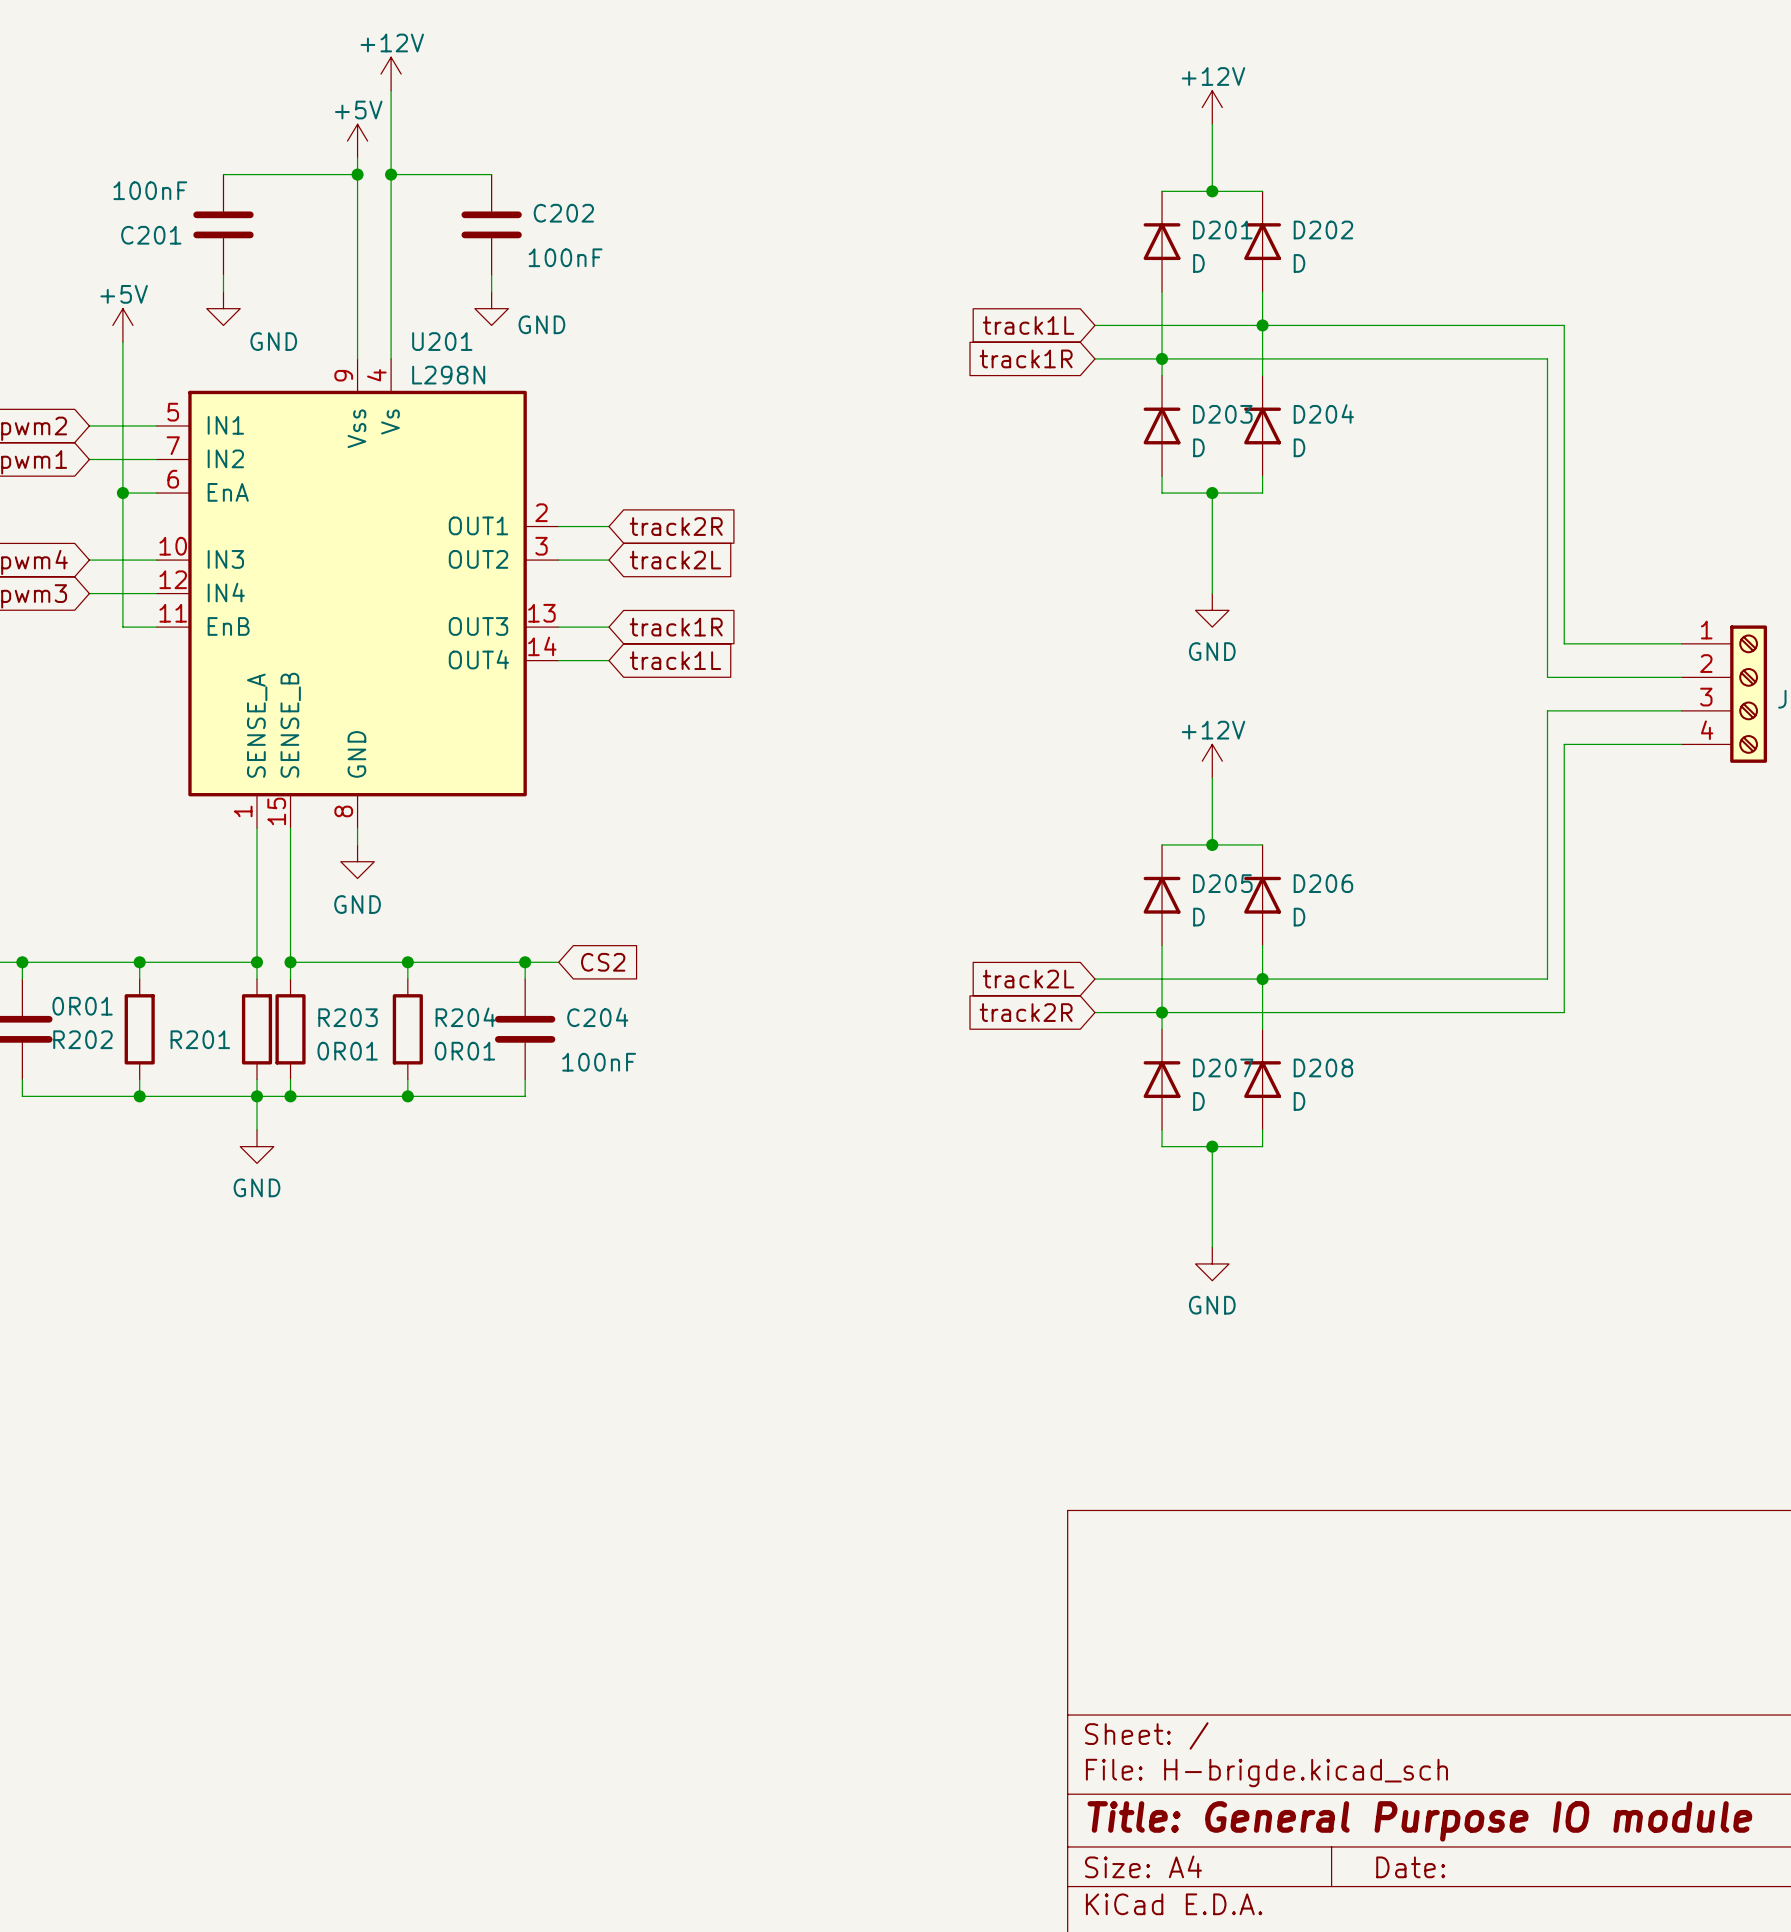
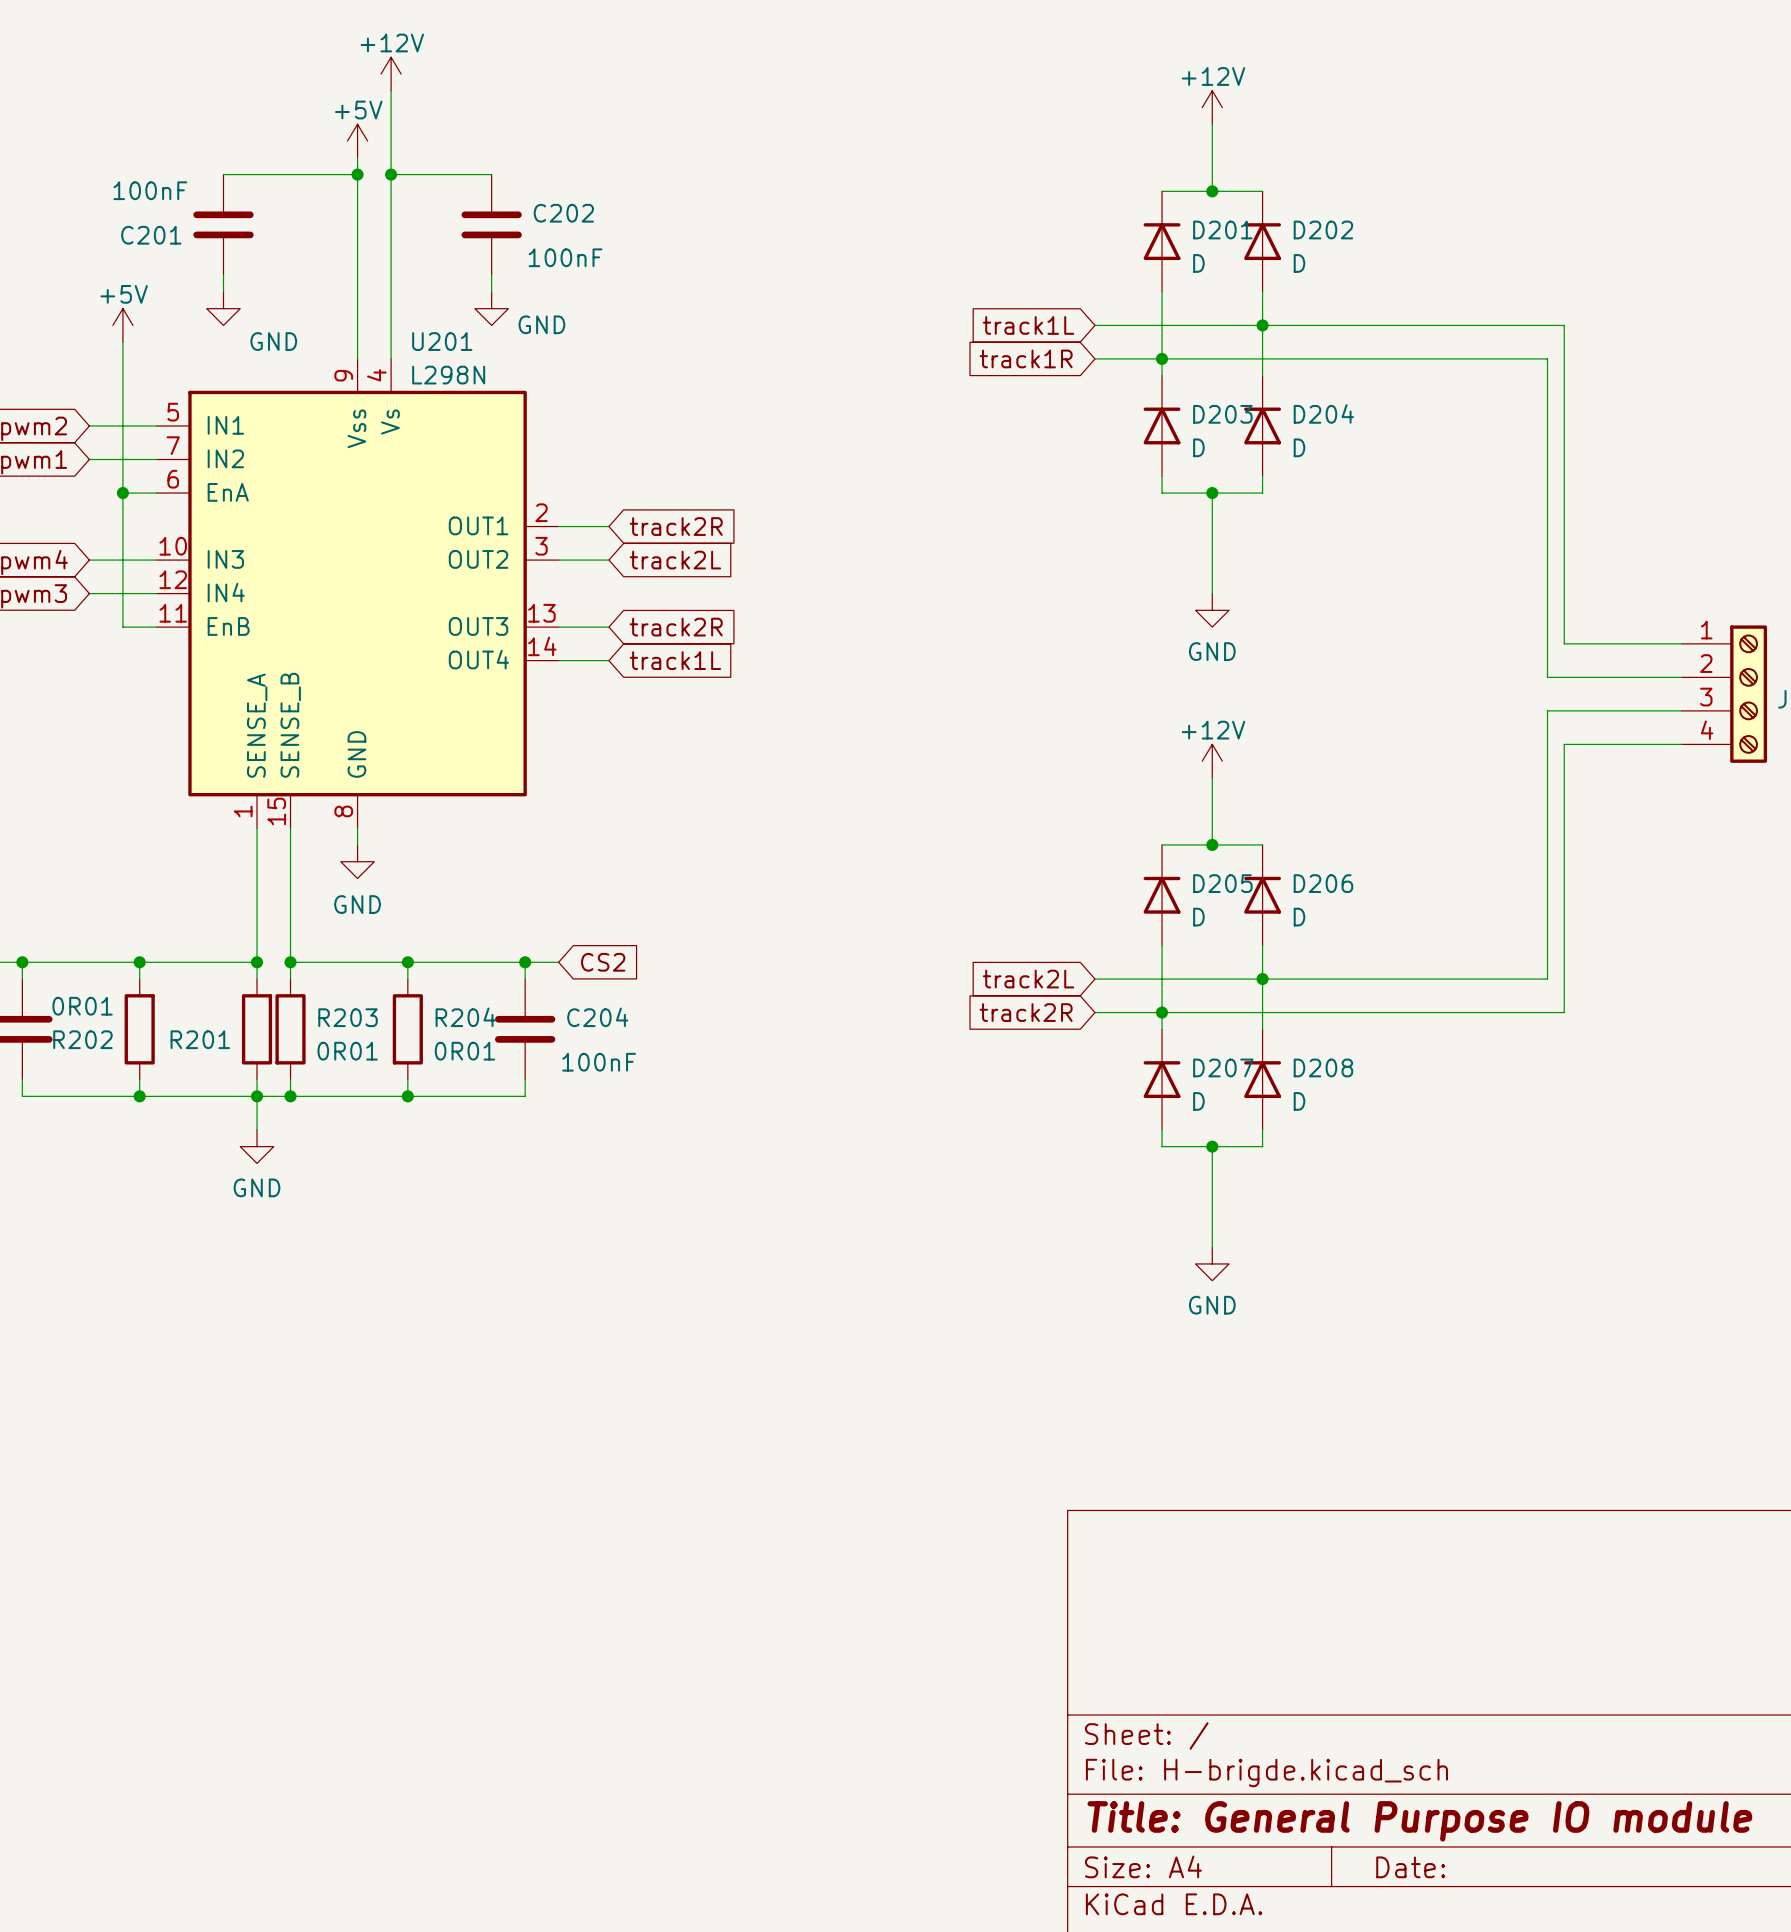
global label: track1R (676, 627) -> track2R (676, 627)

